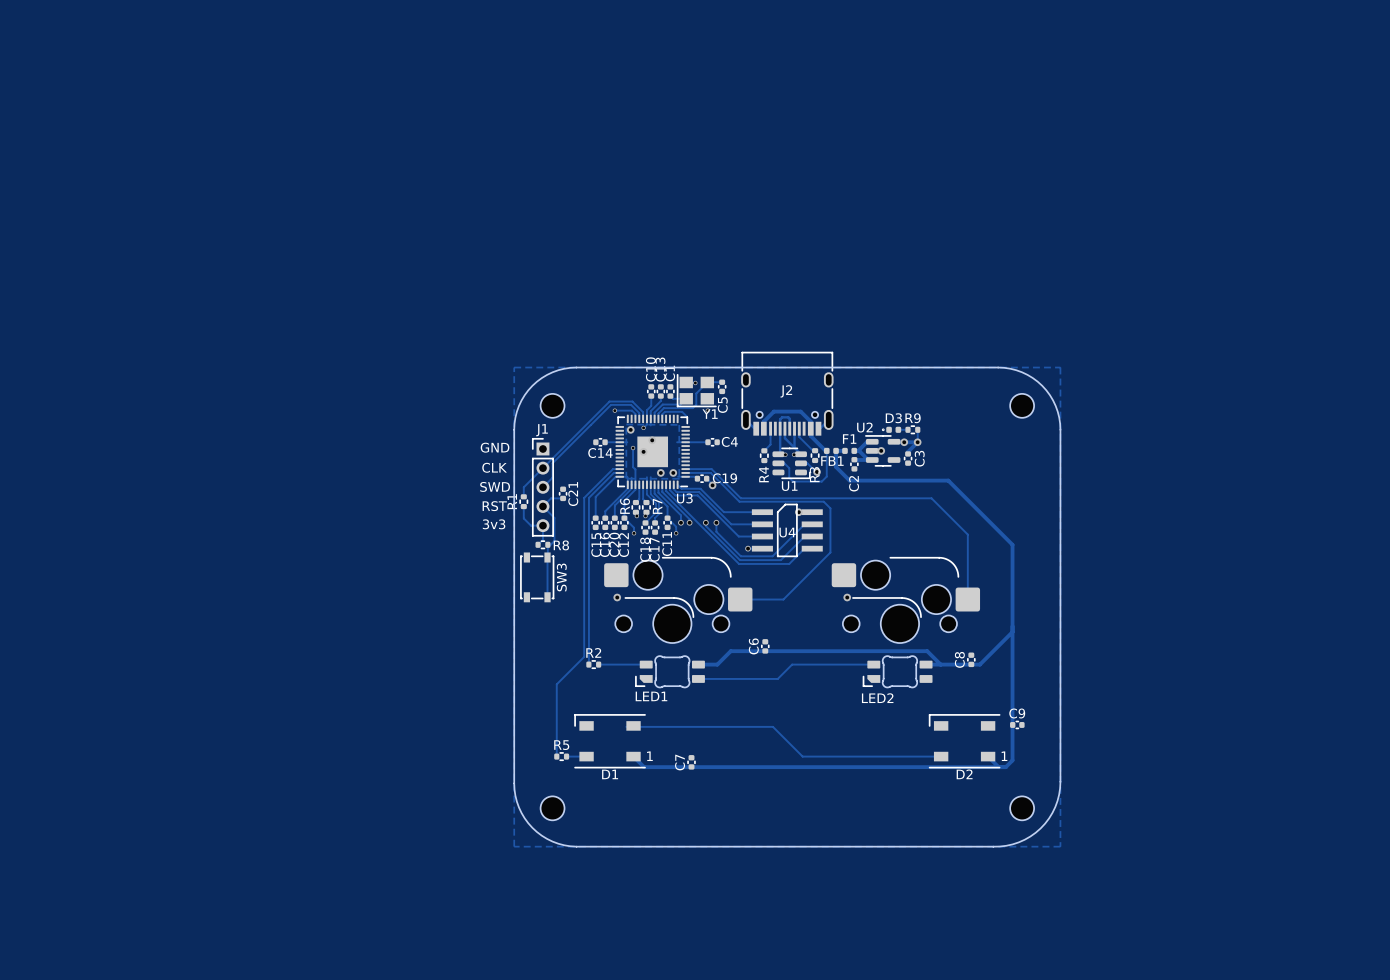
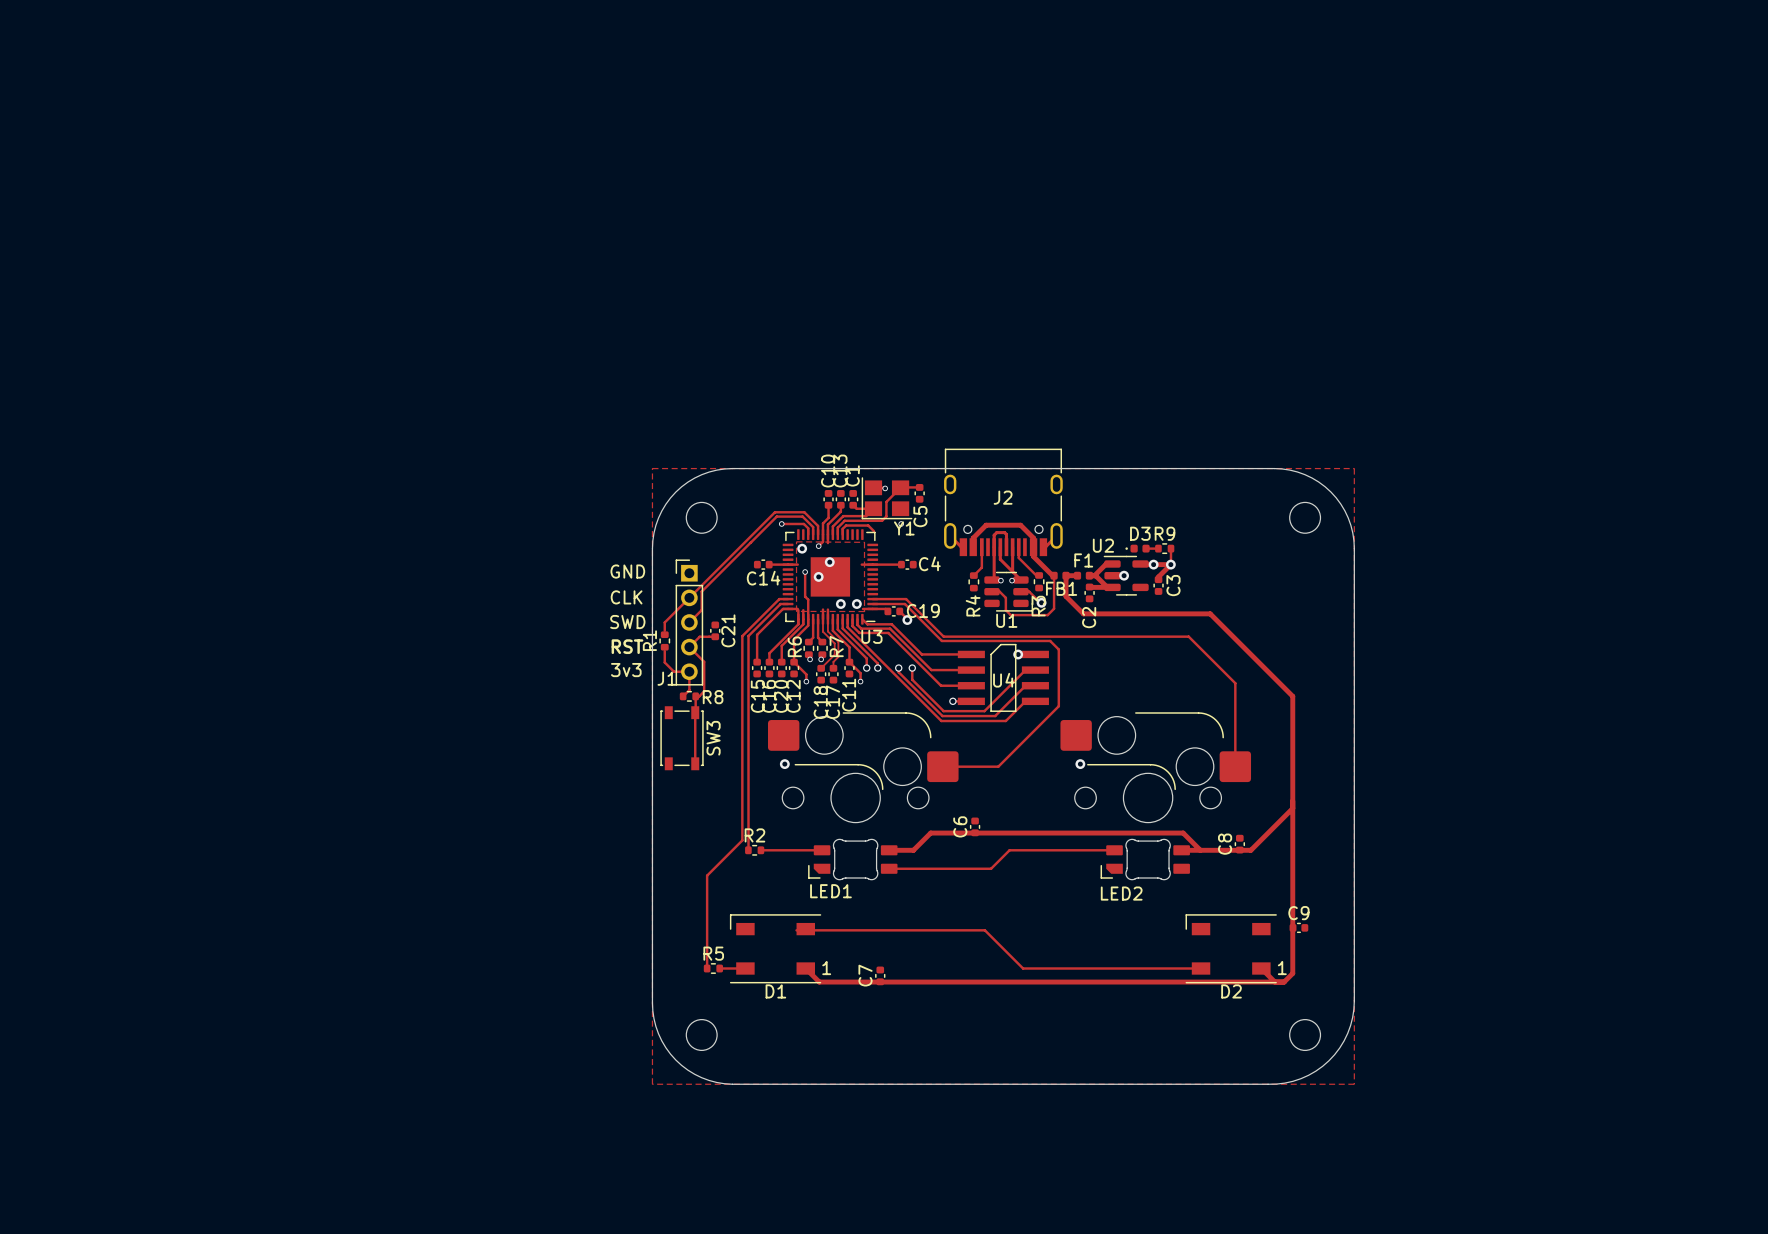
J1 name position: J1 (542, 430) -> J1 (666, 678)

